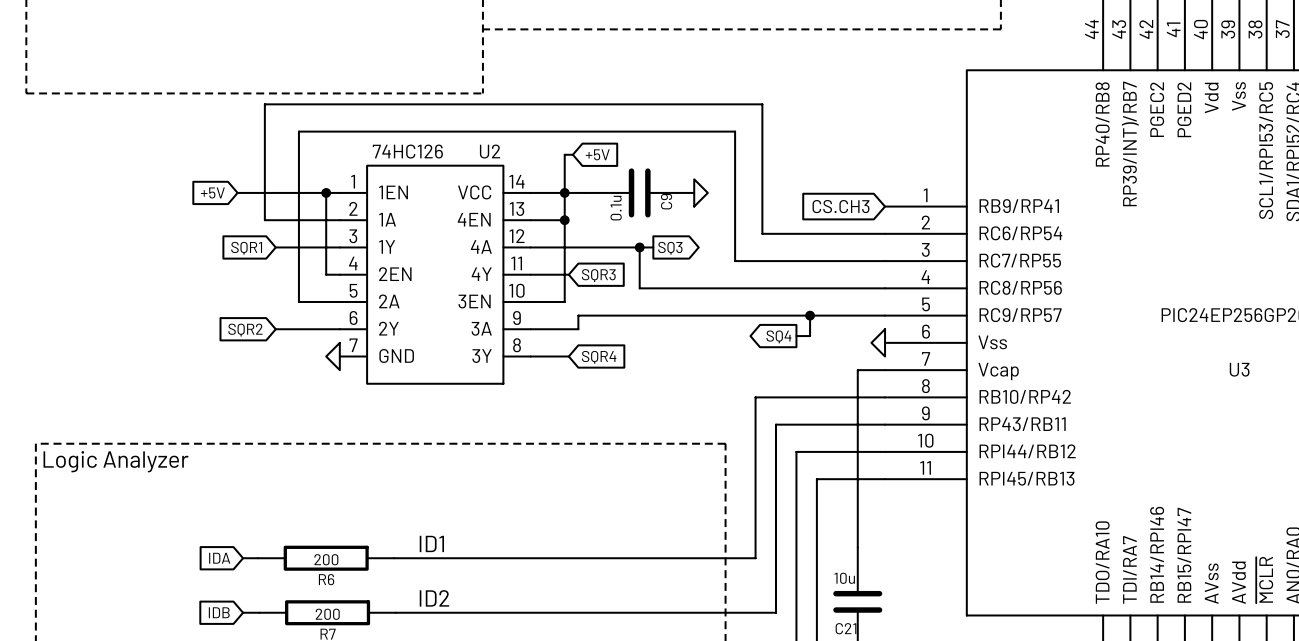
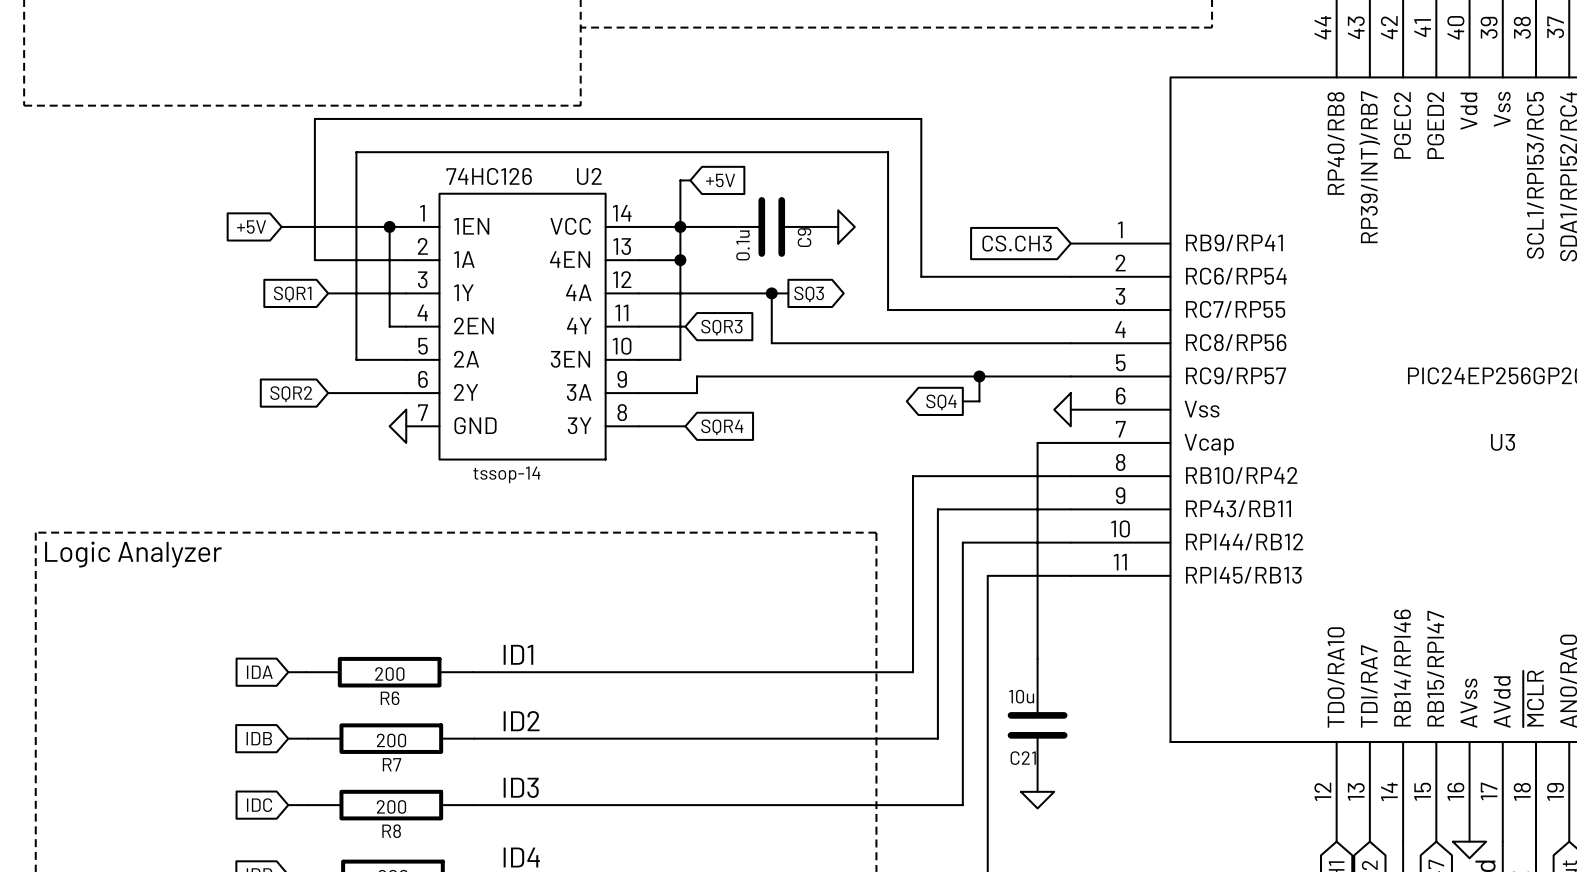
text: none -> tssop-14 (506, 474)

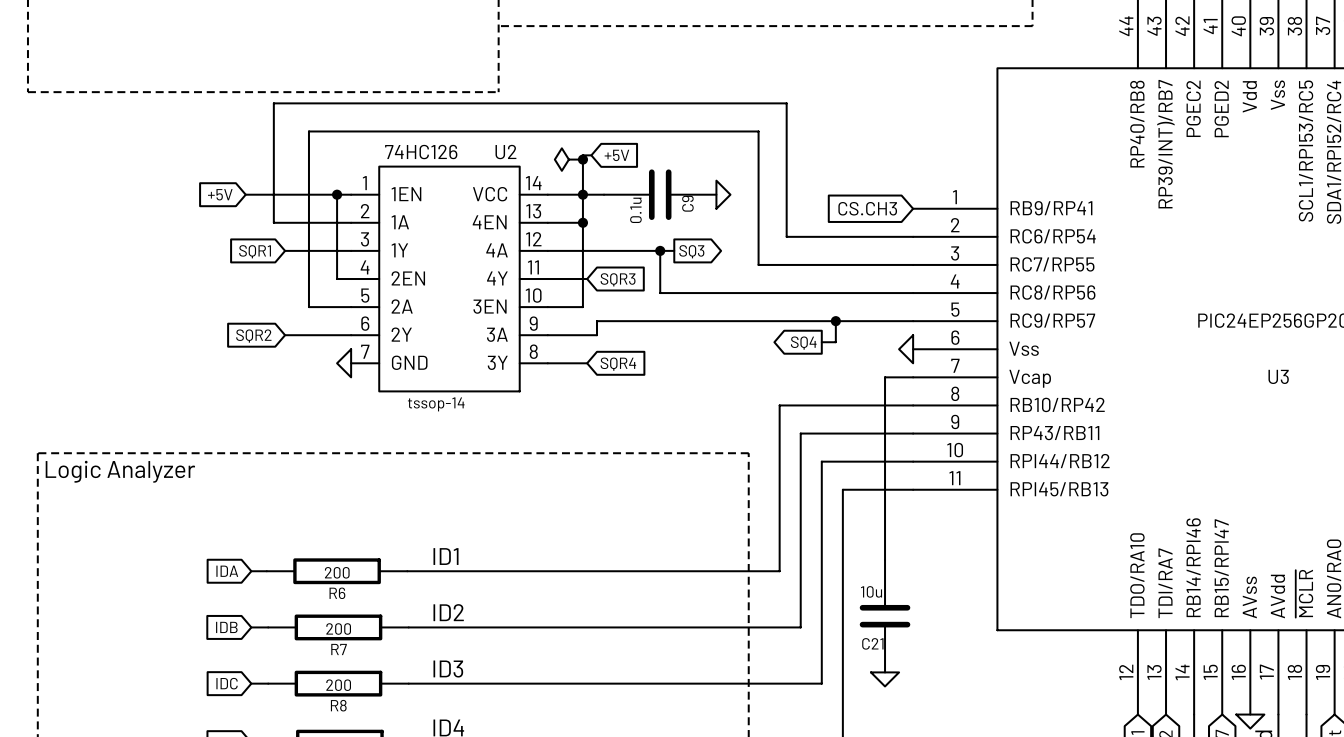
power symbol: none -> (568, 159)
junction: none -> (582, 159)

